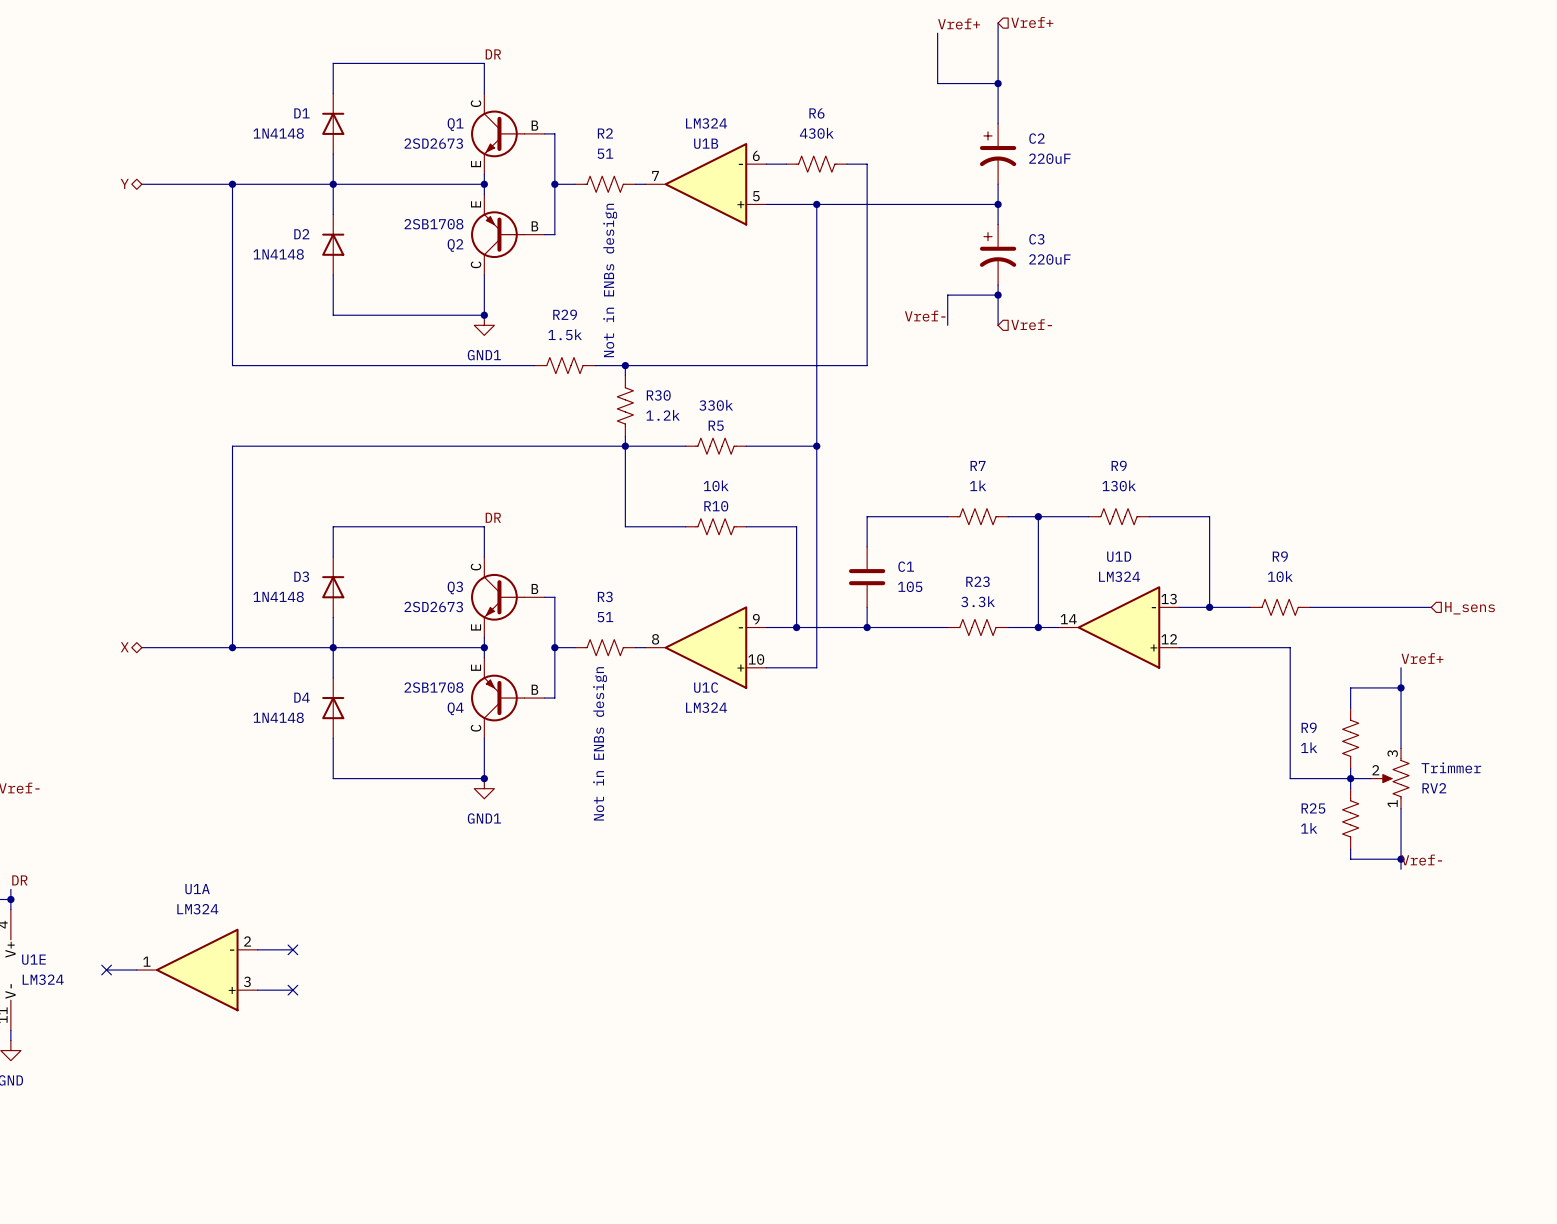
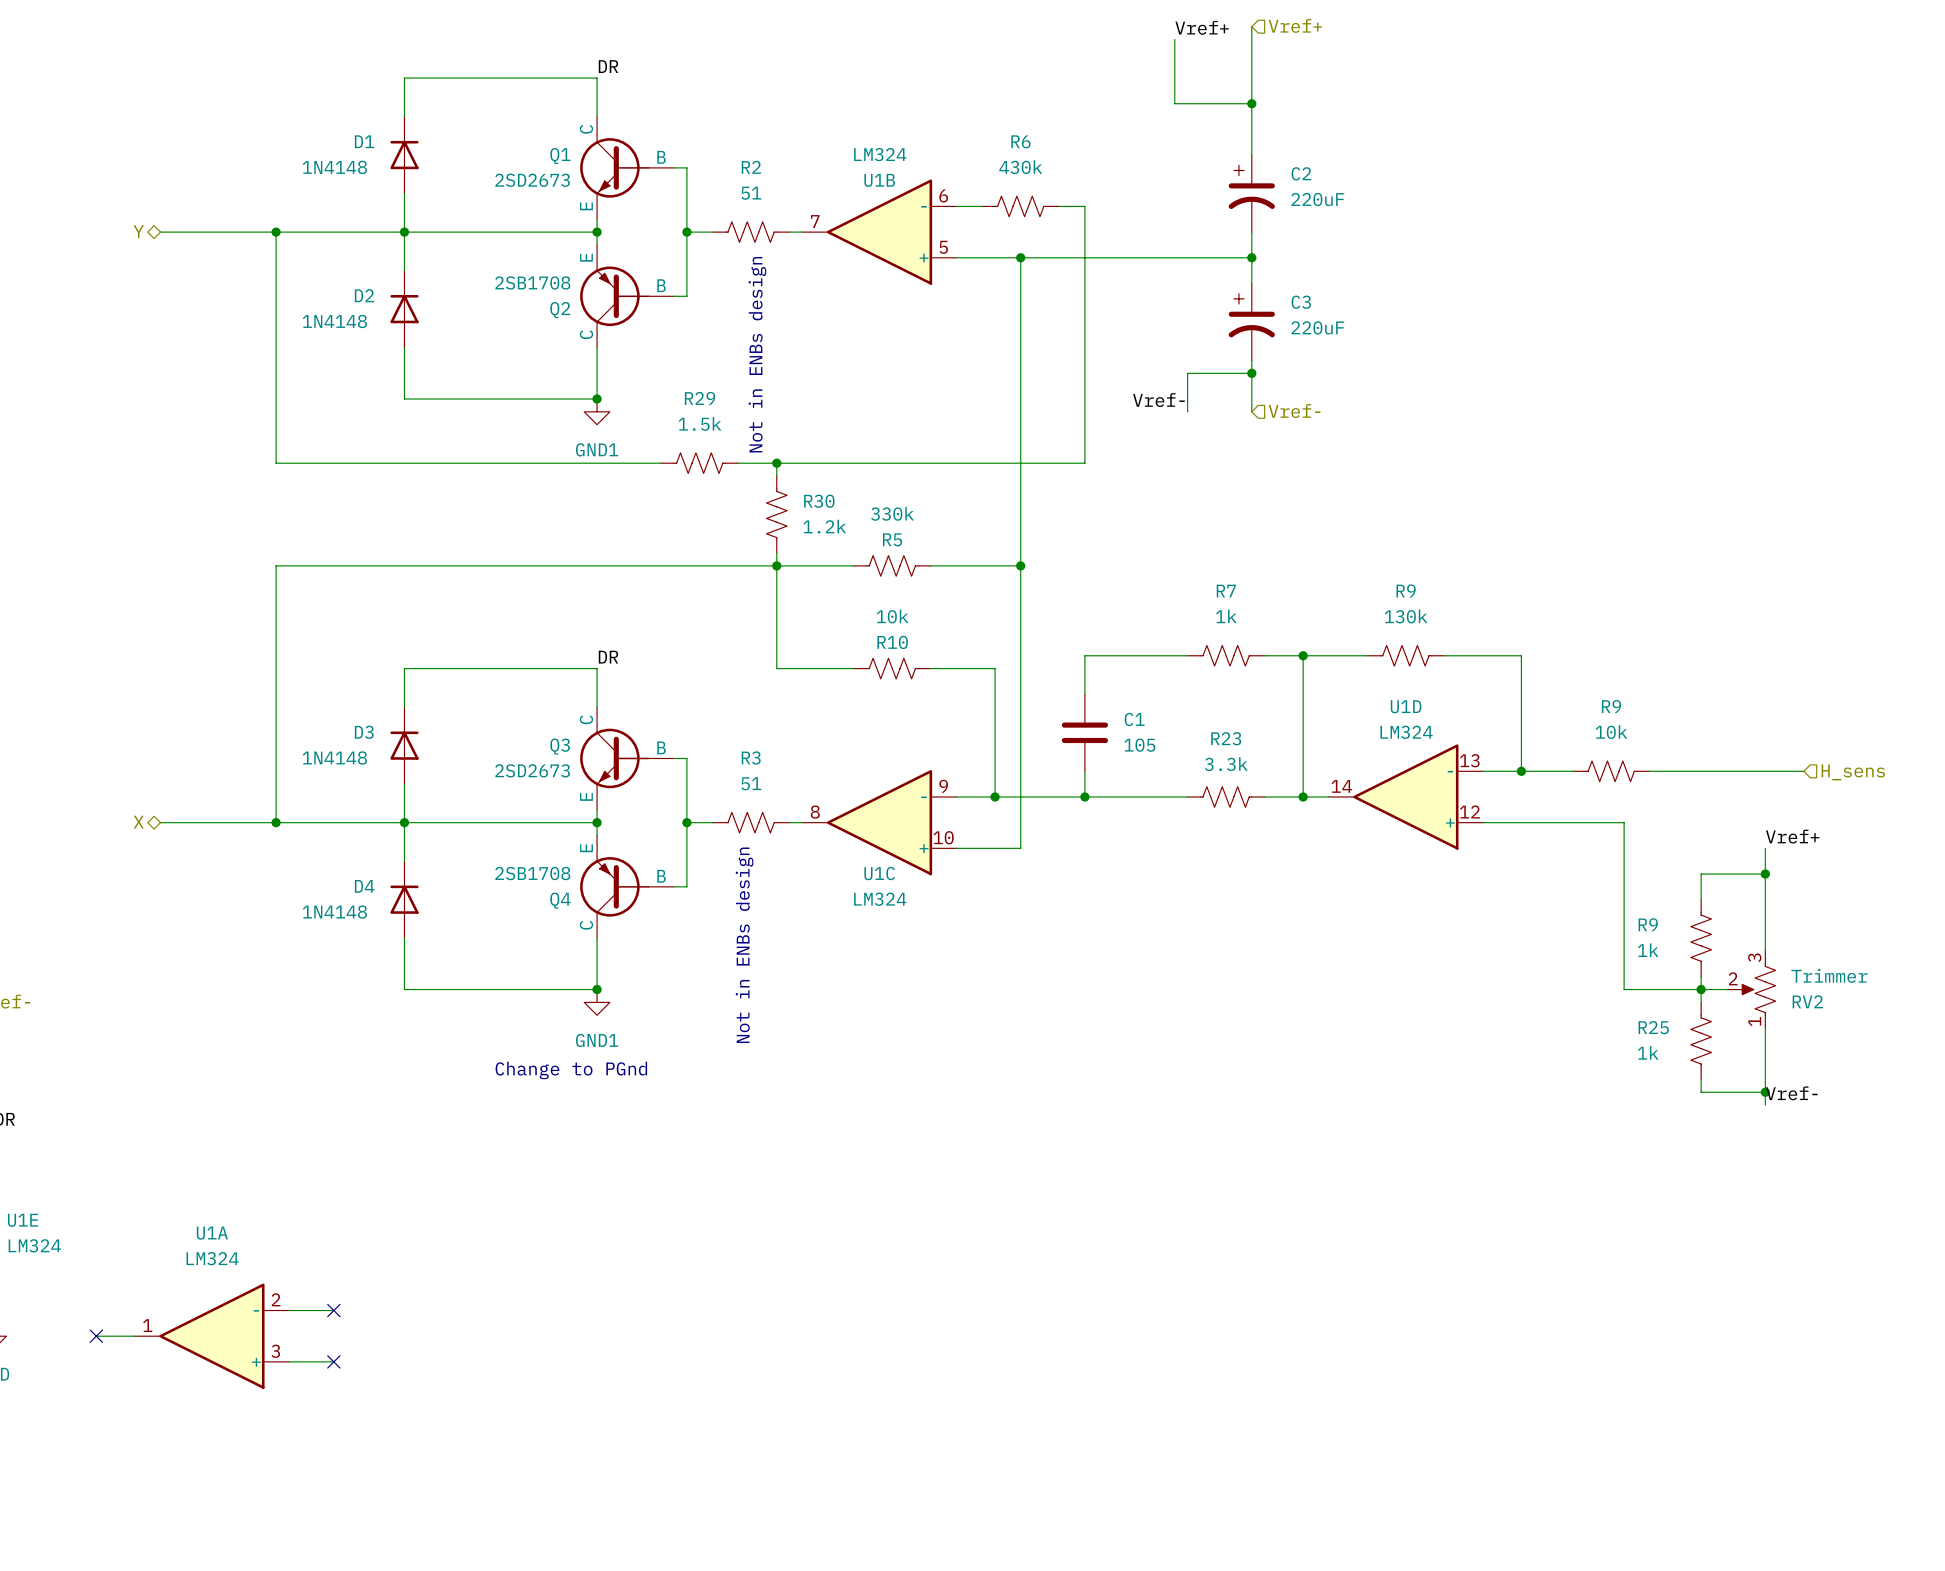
text: none -> Change to PGnd (571, 1070)
wire: (257, 949) (292, 949) -> (288, 1361) (333, 1361)
no-connect mark: (292, 949) -> none
wire: (106, 970) (136, 970) -> (96, 1336) (134, 1336)
no-connect mark: (106, 970) -> none
U1A position: (197, 970) -> (211, 1336)
wire: (257, 990) (292, 990) -> (288, 1310) (333, 1310)
no-connect mark: (292, 990) -> none
no-connect mark: none -> (333, 1310)
no-connect mark: none -> (96, 1336)
no-connect mark: none -> (333, 1361)

